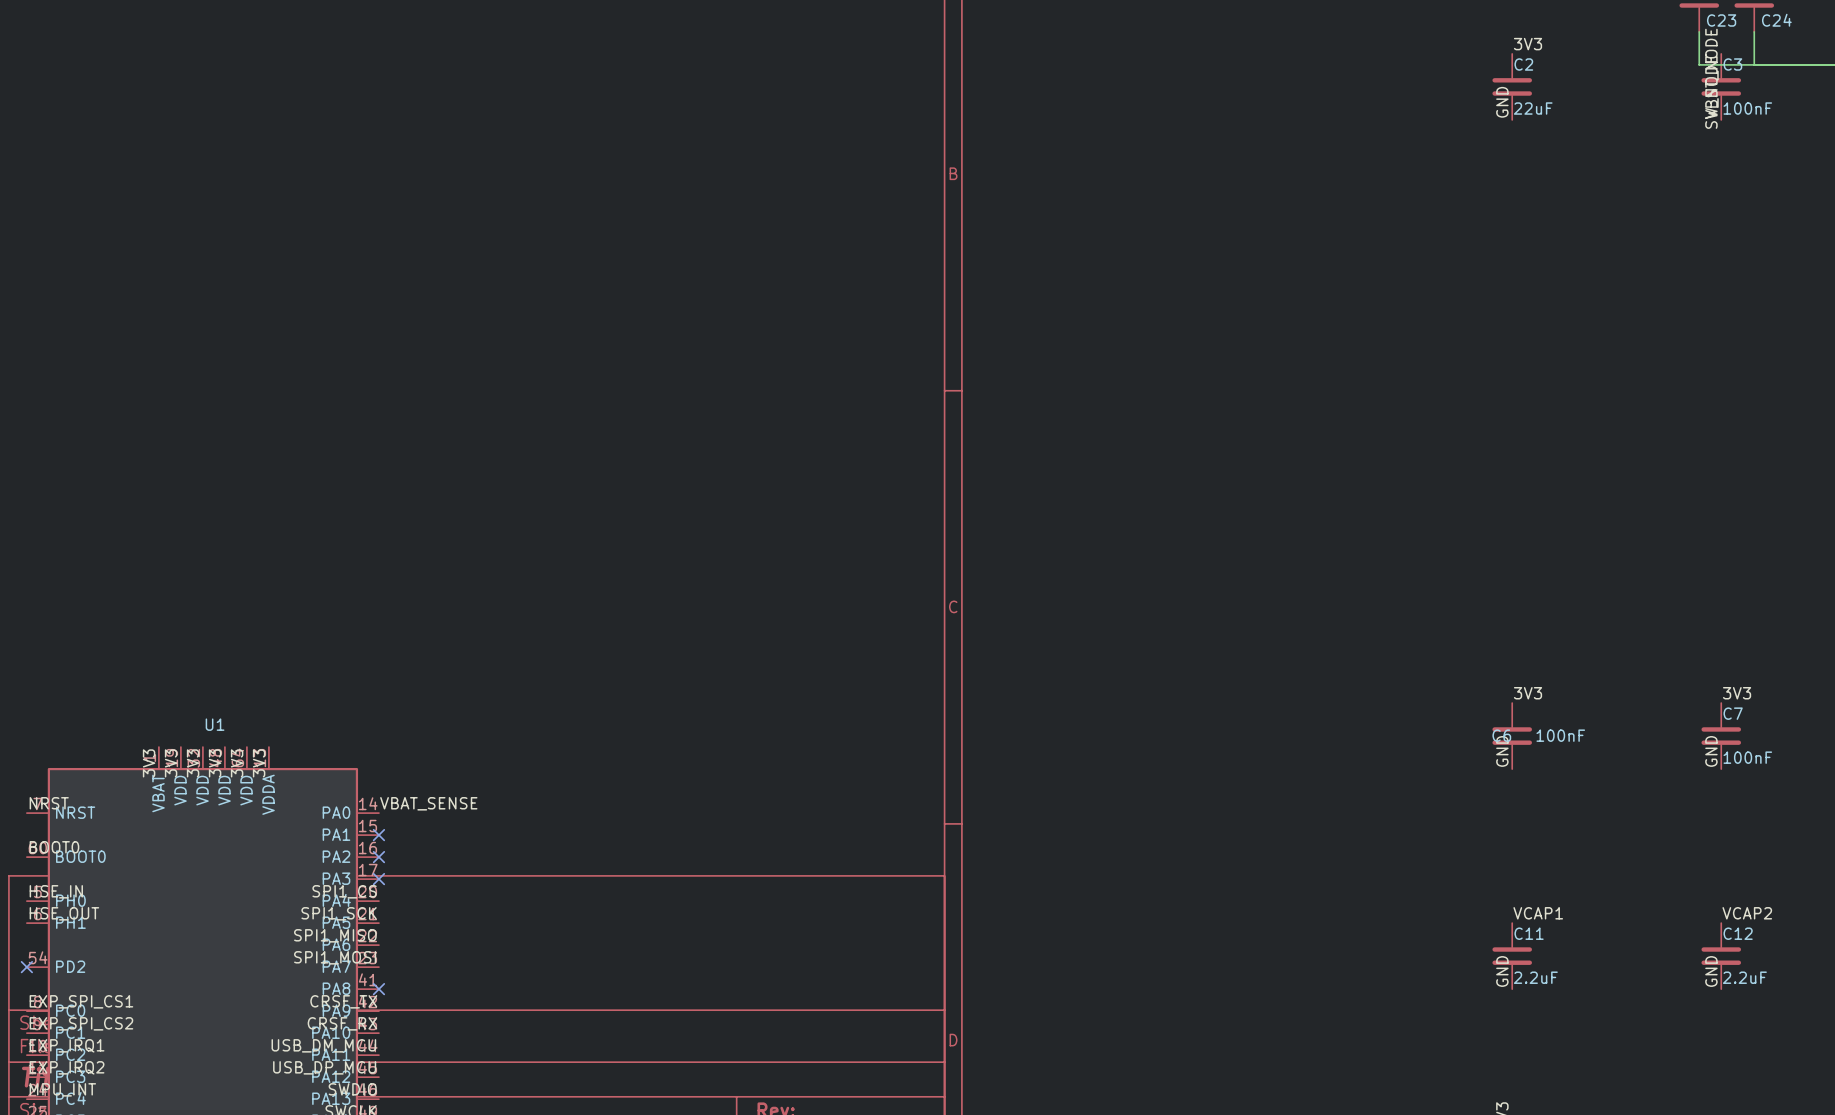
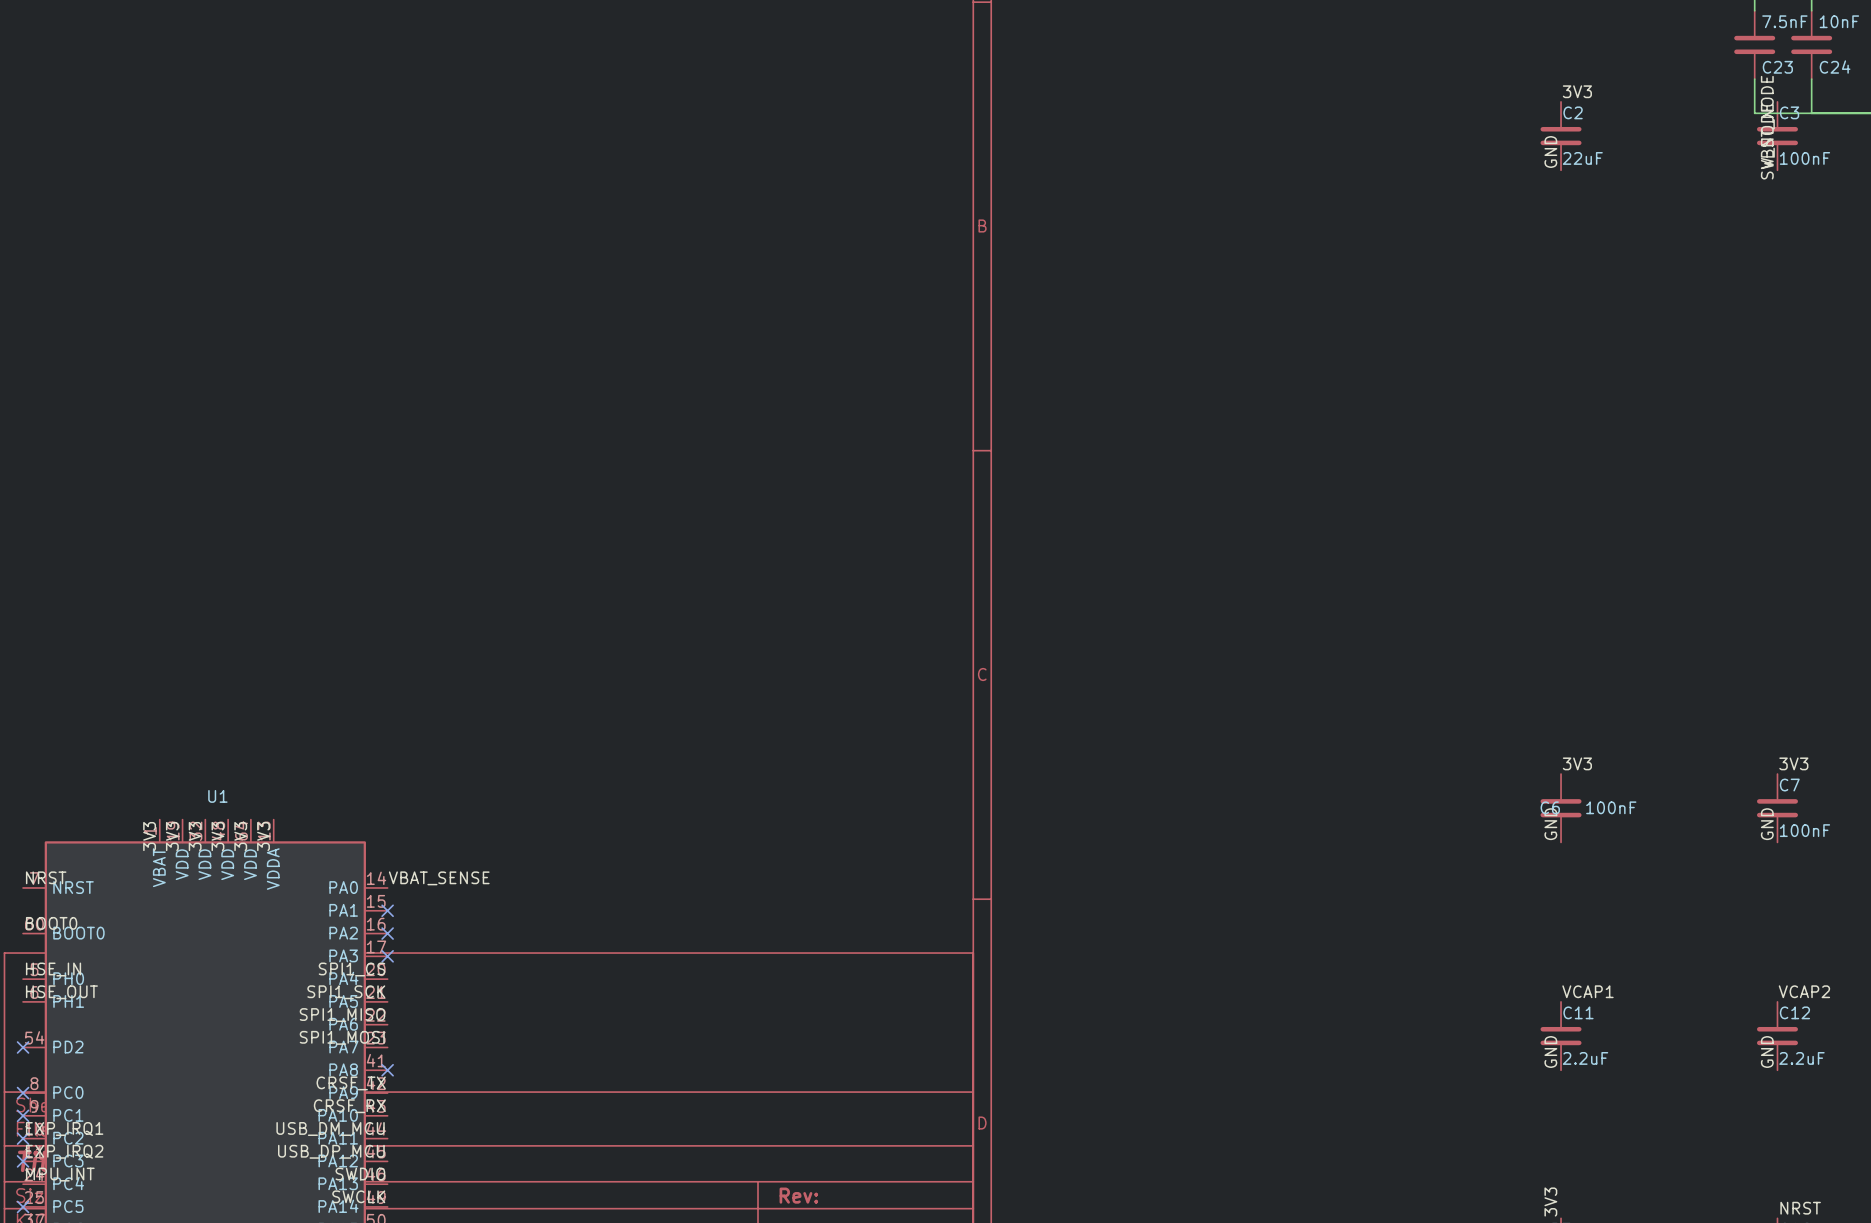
label: EXP_SPI_CS1 (81, 1001) -> none
no-connect mark: none -> (23, 1093)
label: EXP_SPI_CS2 (81, 1023) -> none
no-connect mark: none -> (23, 1115)
no-connect mark: none -> (23, 1138)
no-connect mark: none -> (23, 1161)

